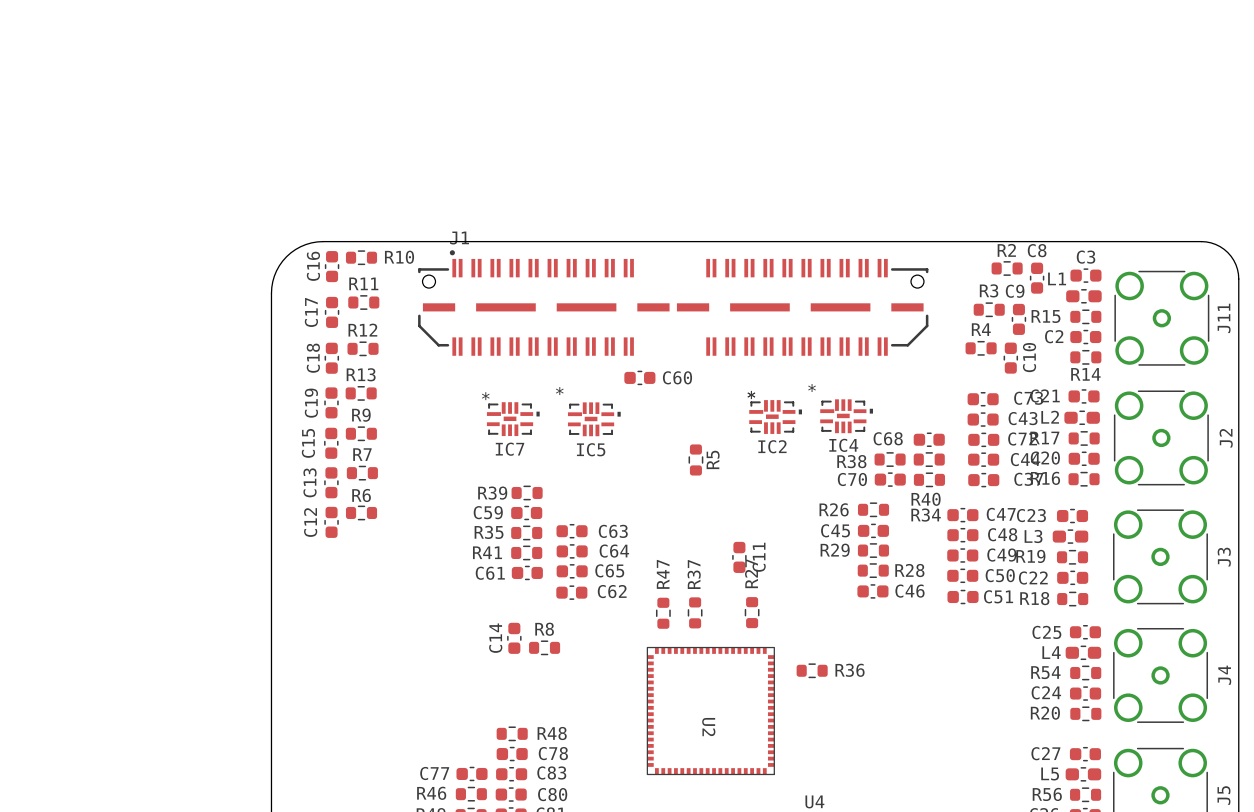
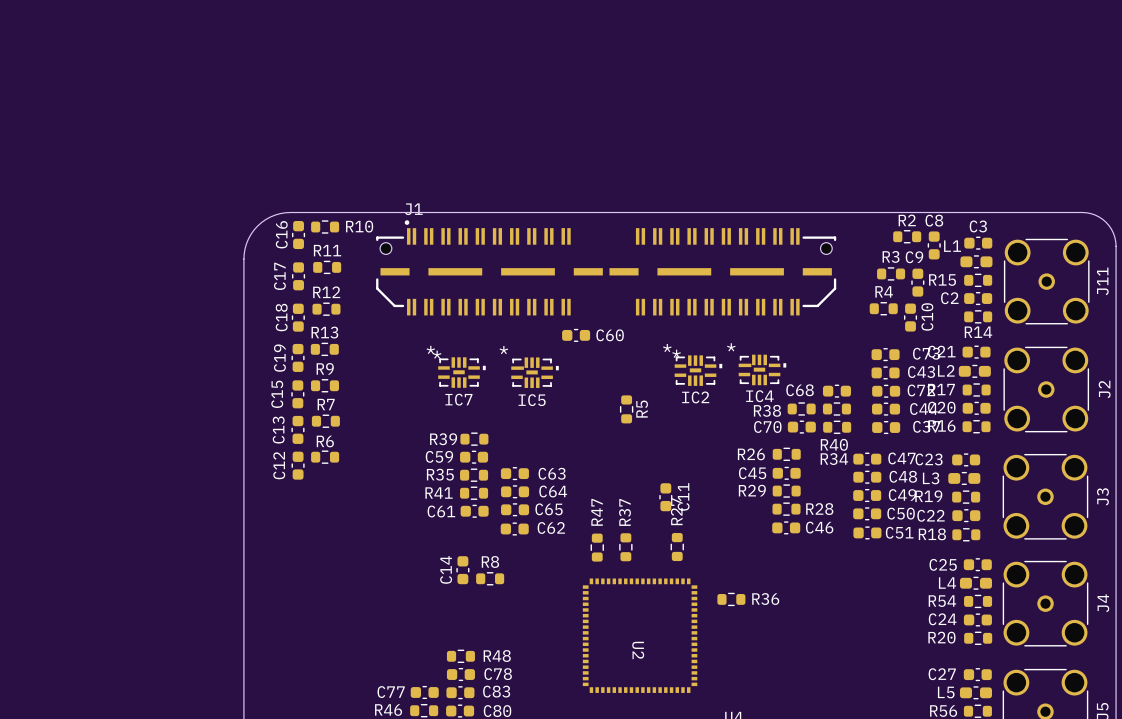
IC2 footprint: [749, 400, 802, 434] -> [674, 355, 723, 386]
IC7 footprint: [486, 402, 540, 437] -> [438, 357, 486, 388]
U2 footprint: [646, 646, 775, 776] -> [582, 578, 698, 693]

